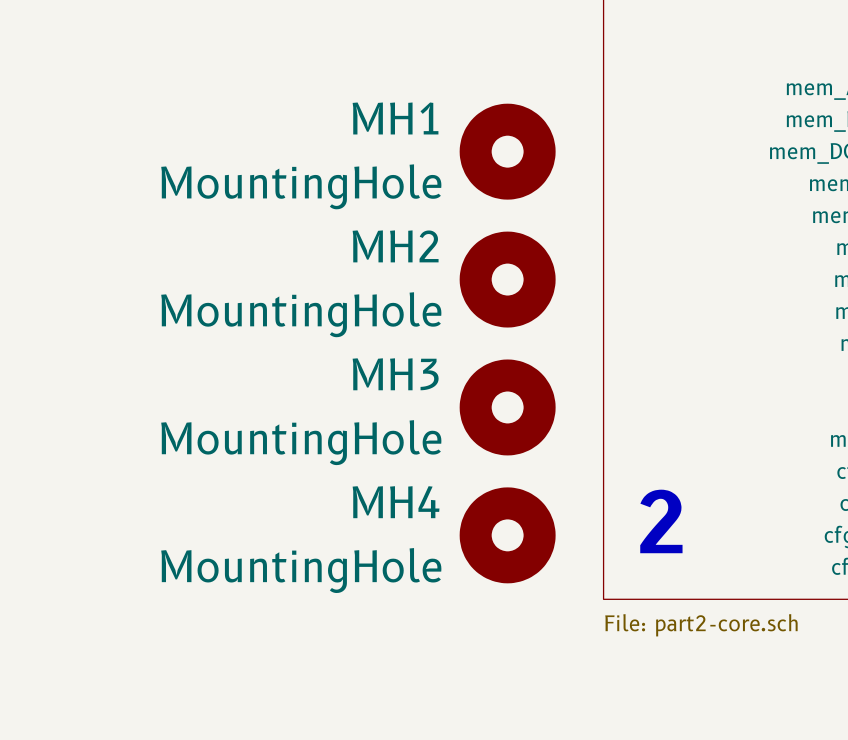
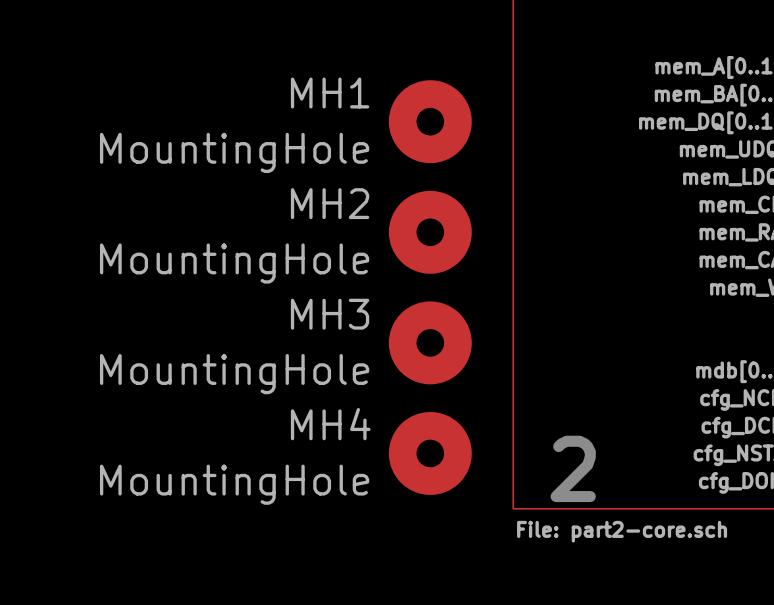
text position: 2 (661, 521) -> 2 (573, 468)

